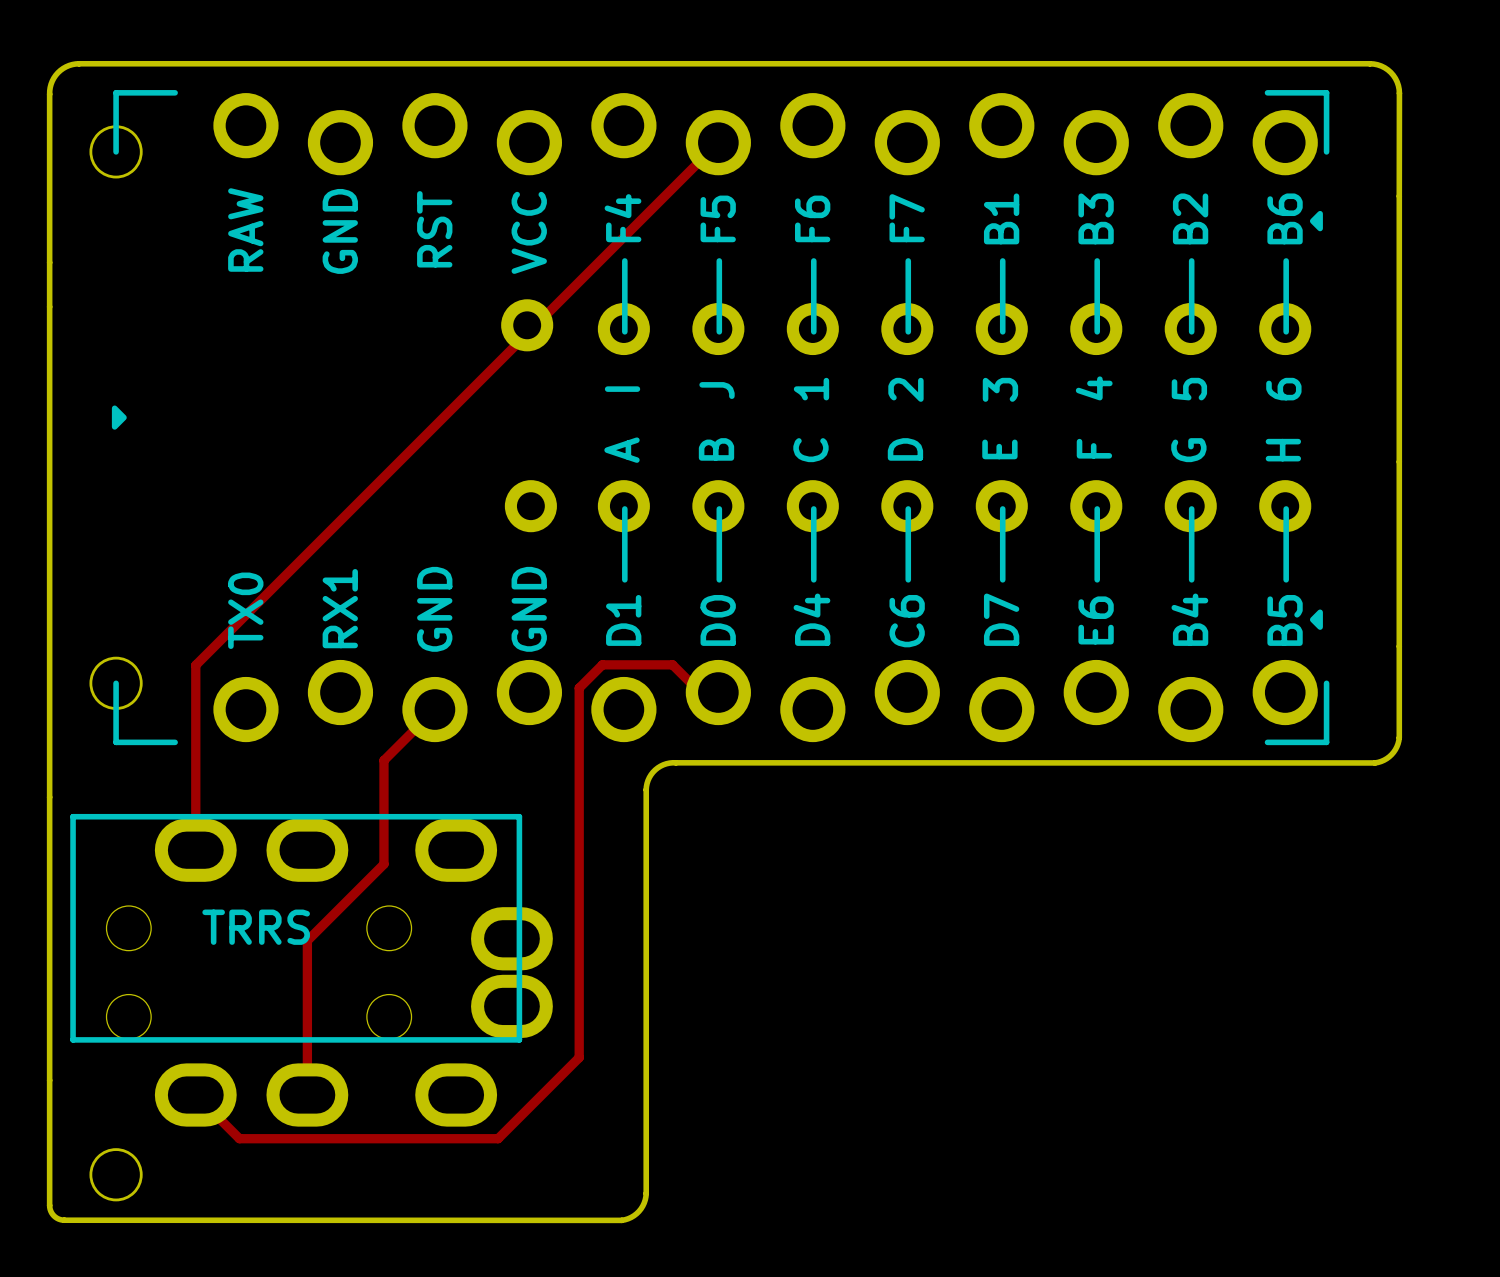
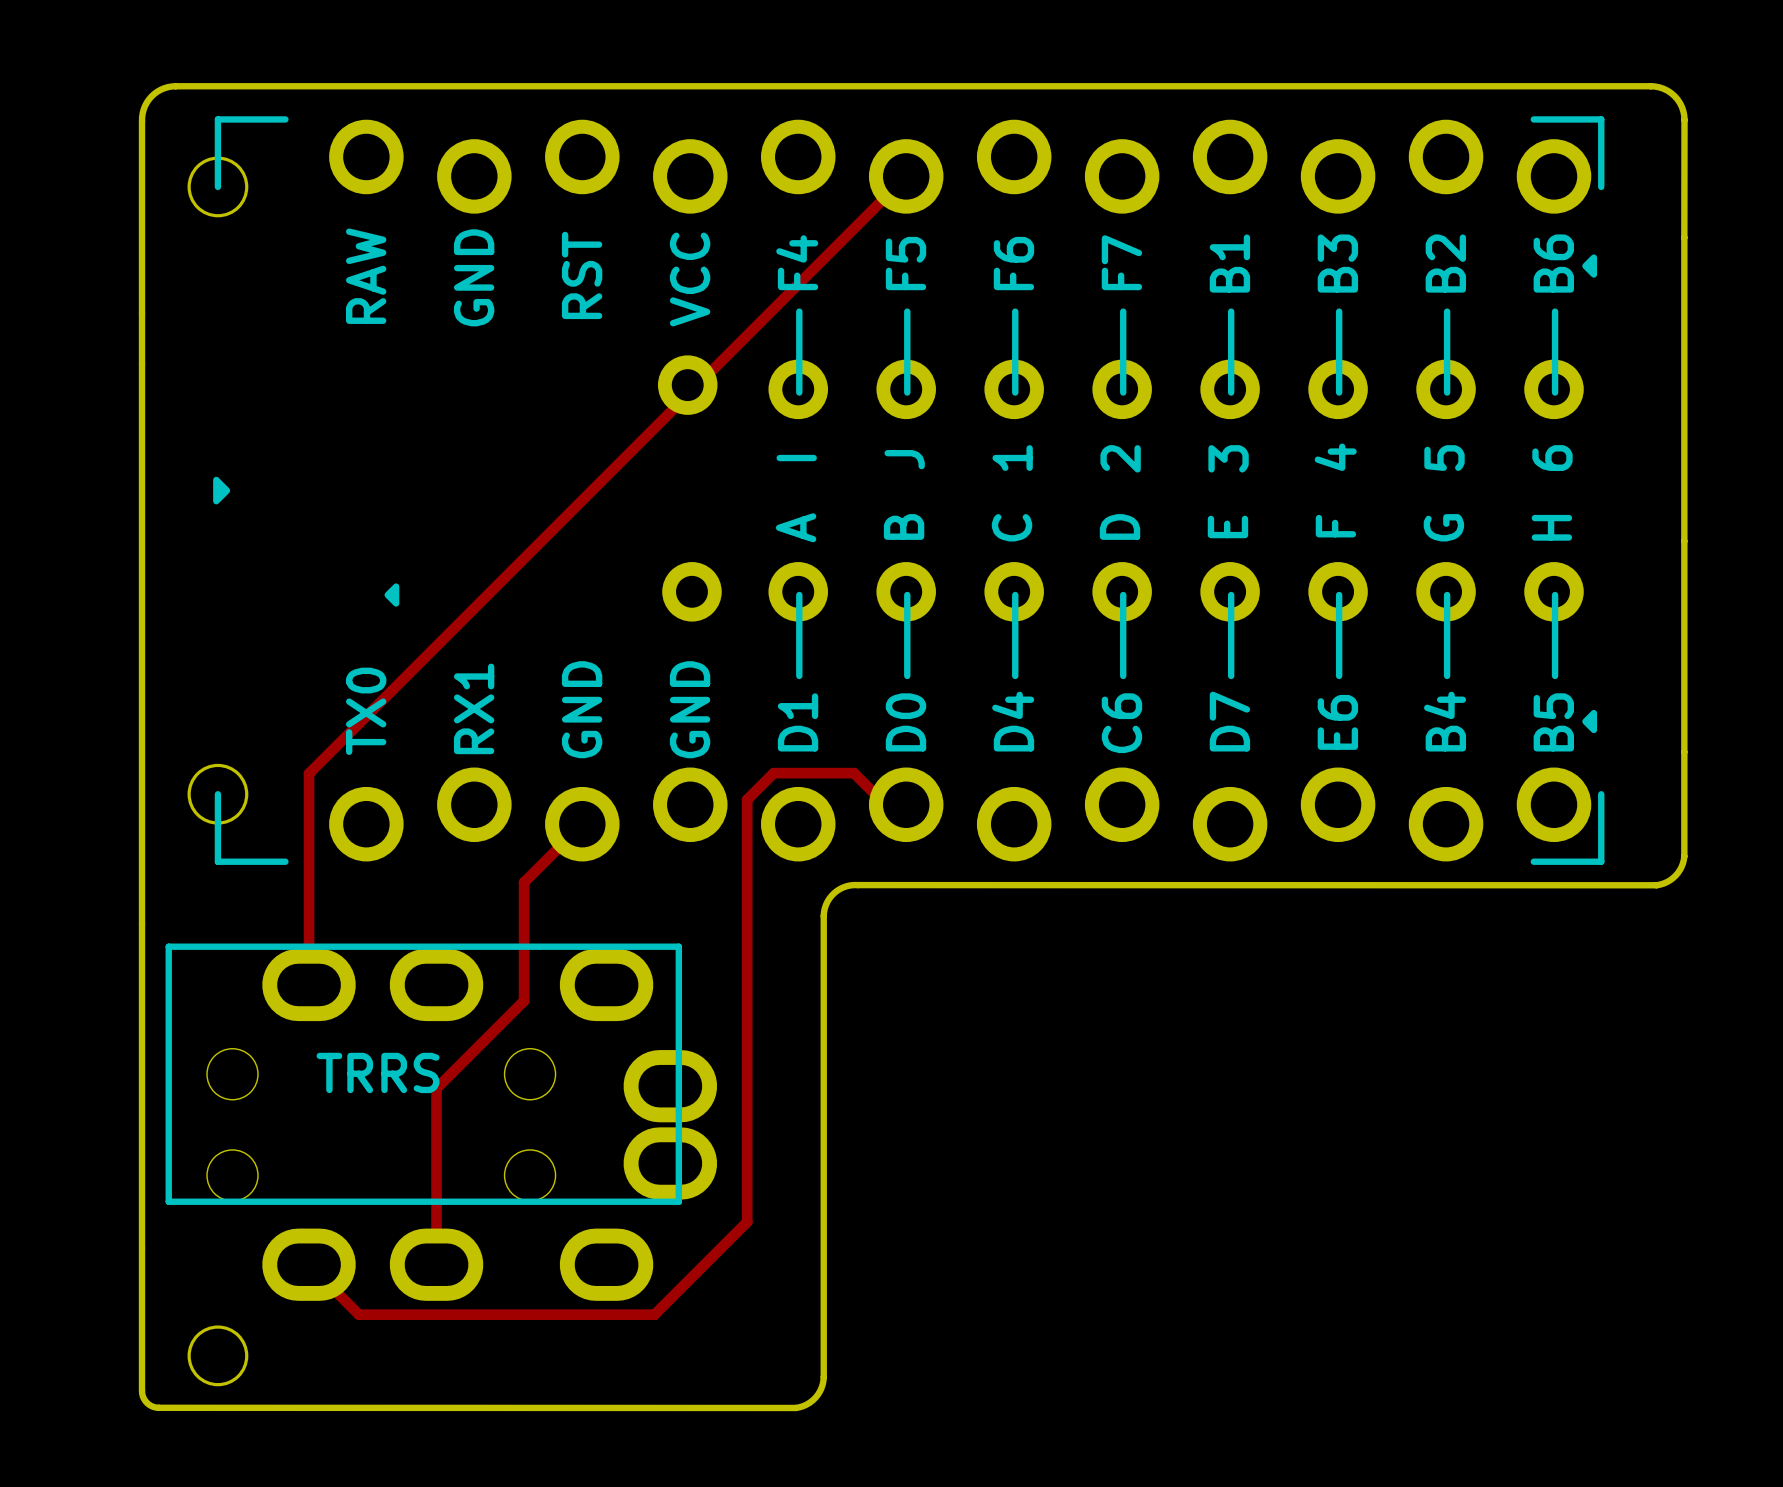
drawing: none -> [384, 583, 400, 607]

